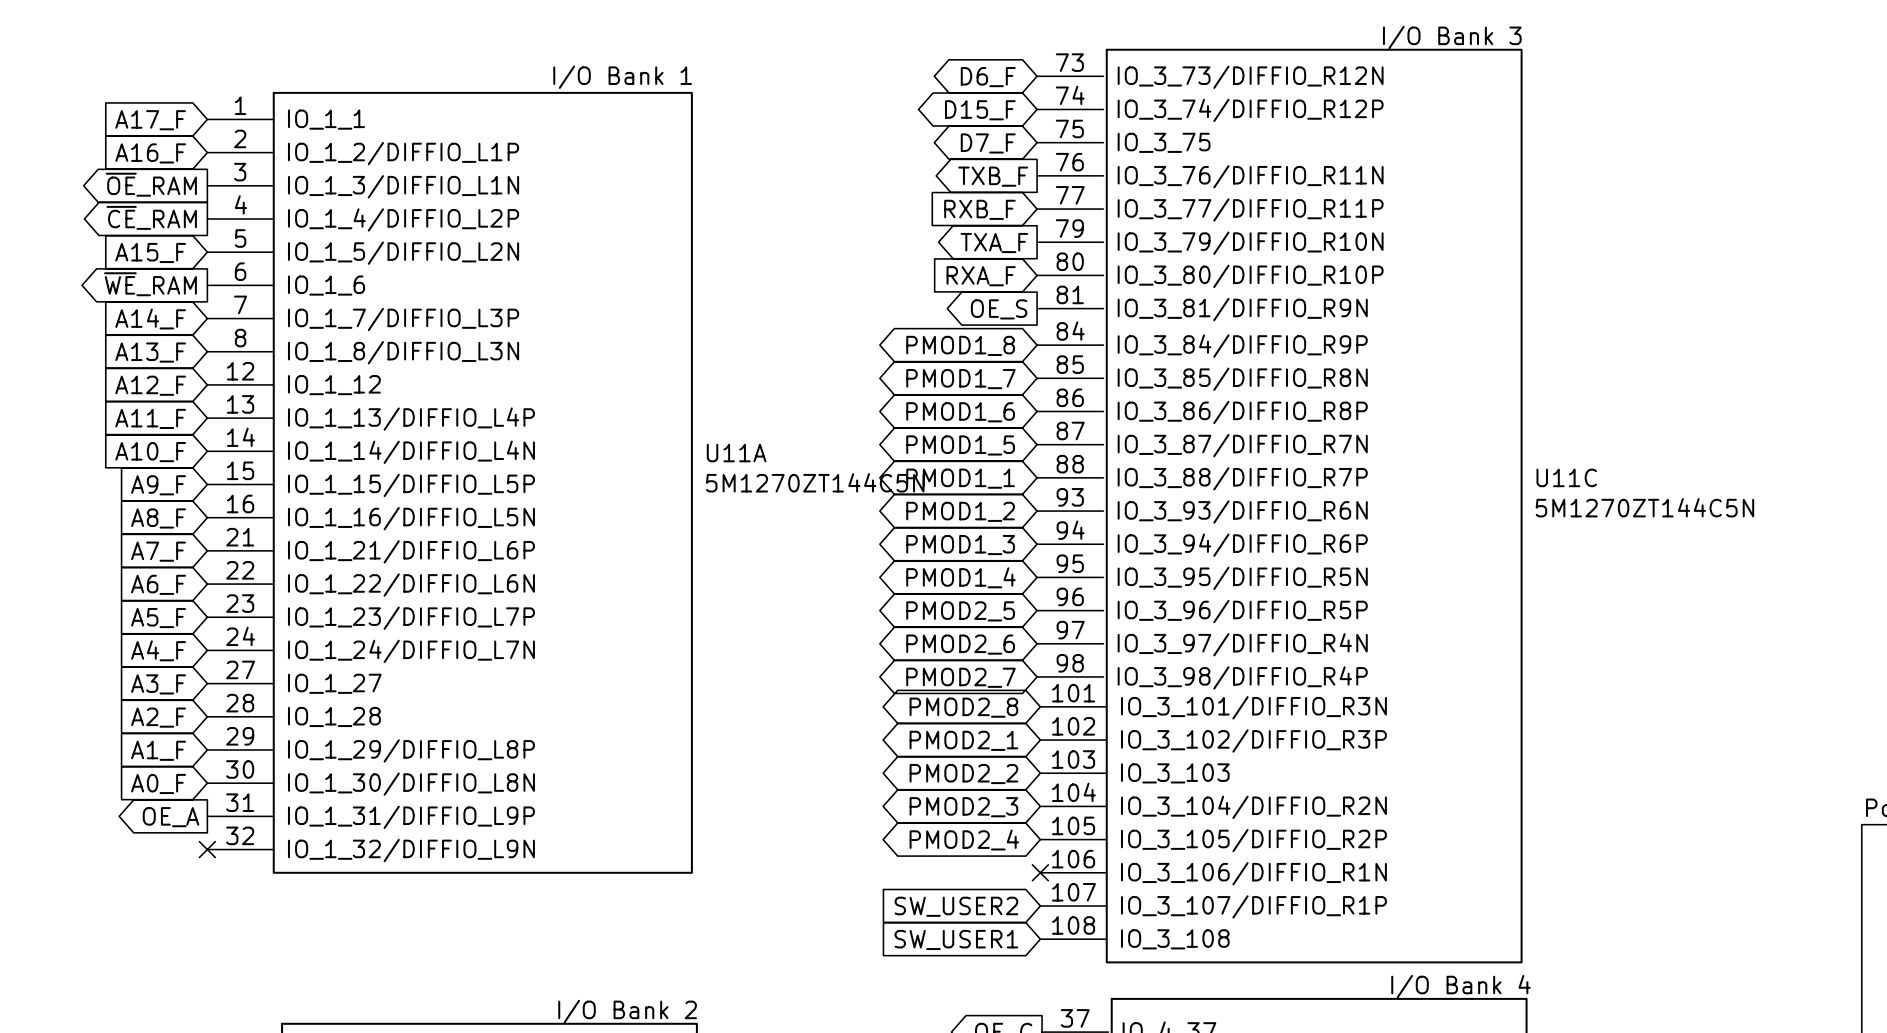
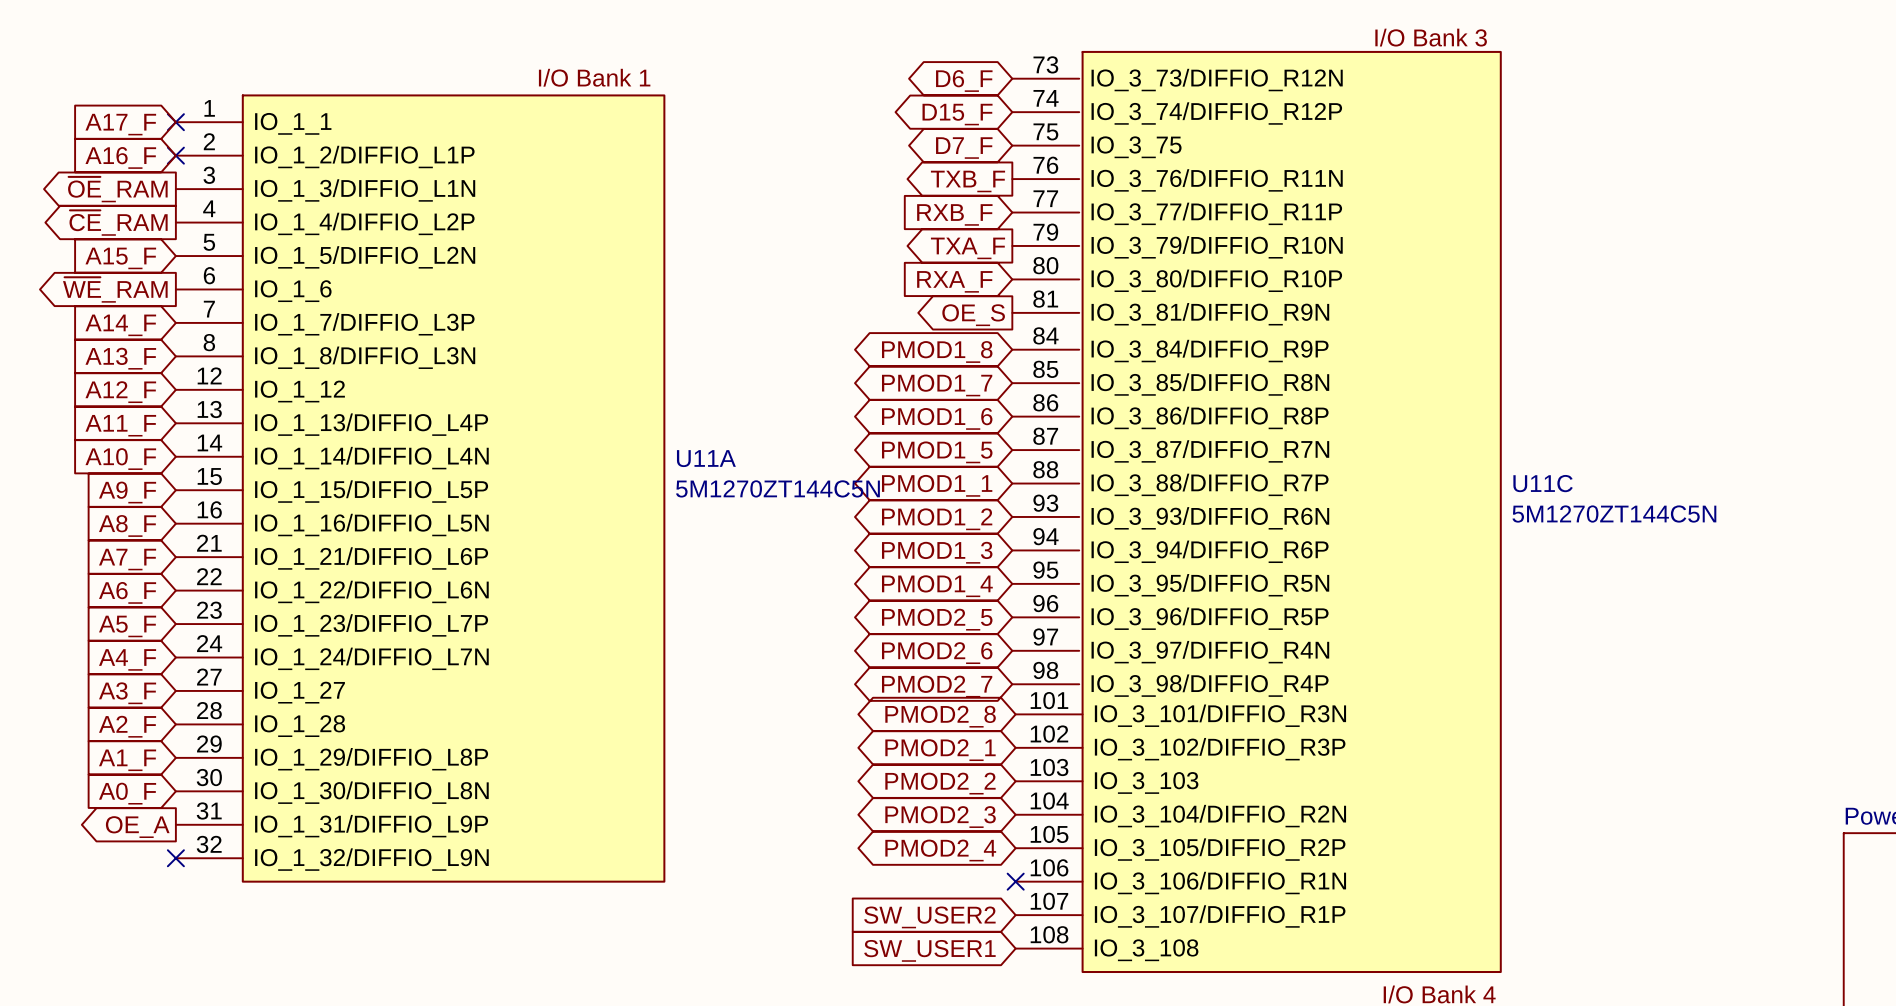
no-connect mark: none -> (175, 122)
no-connect mark: none -> (175, 155)

